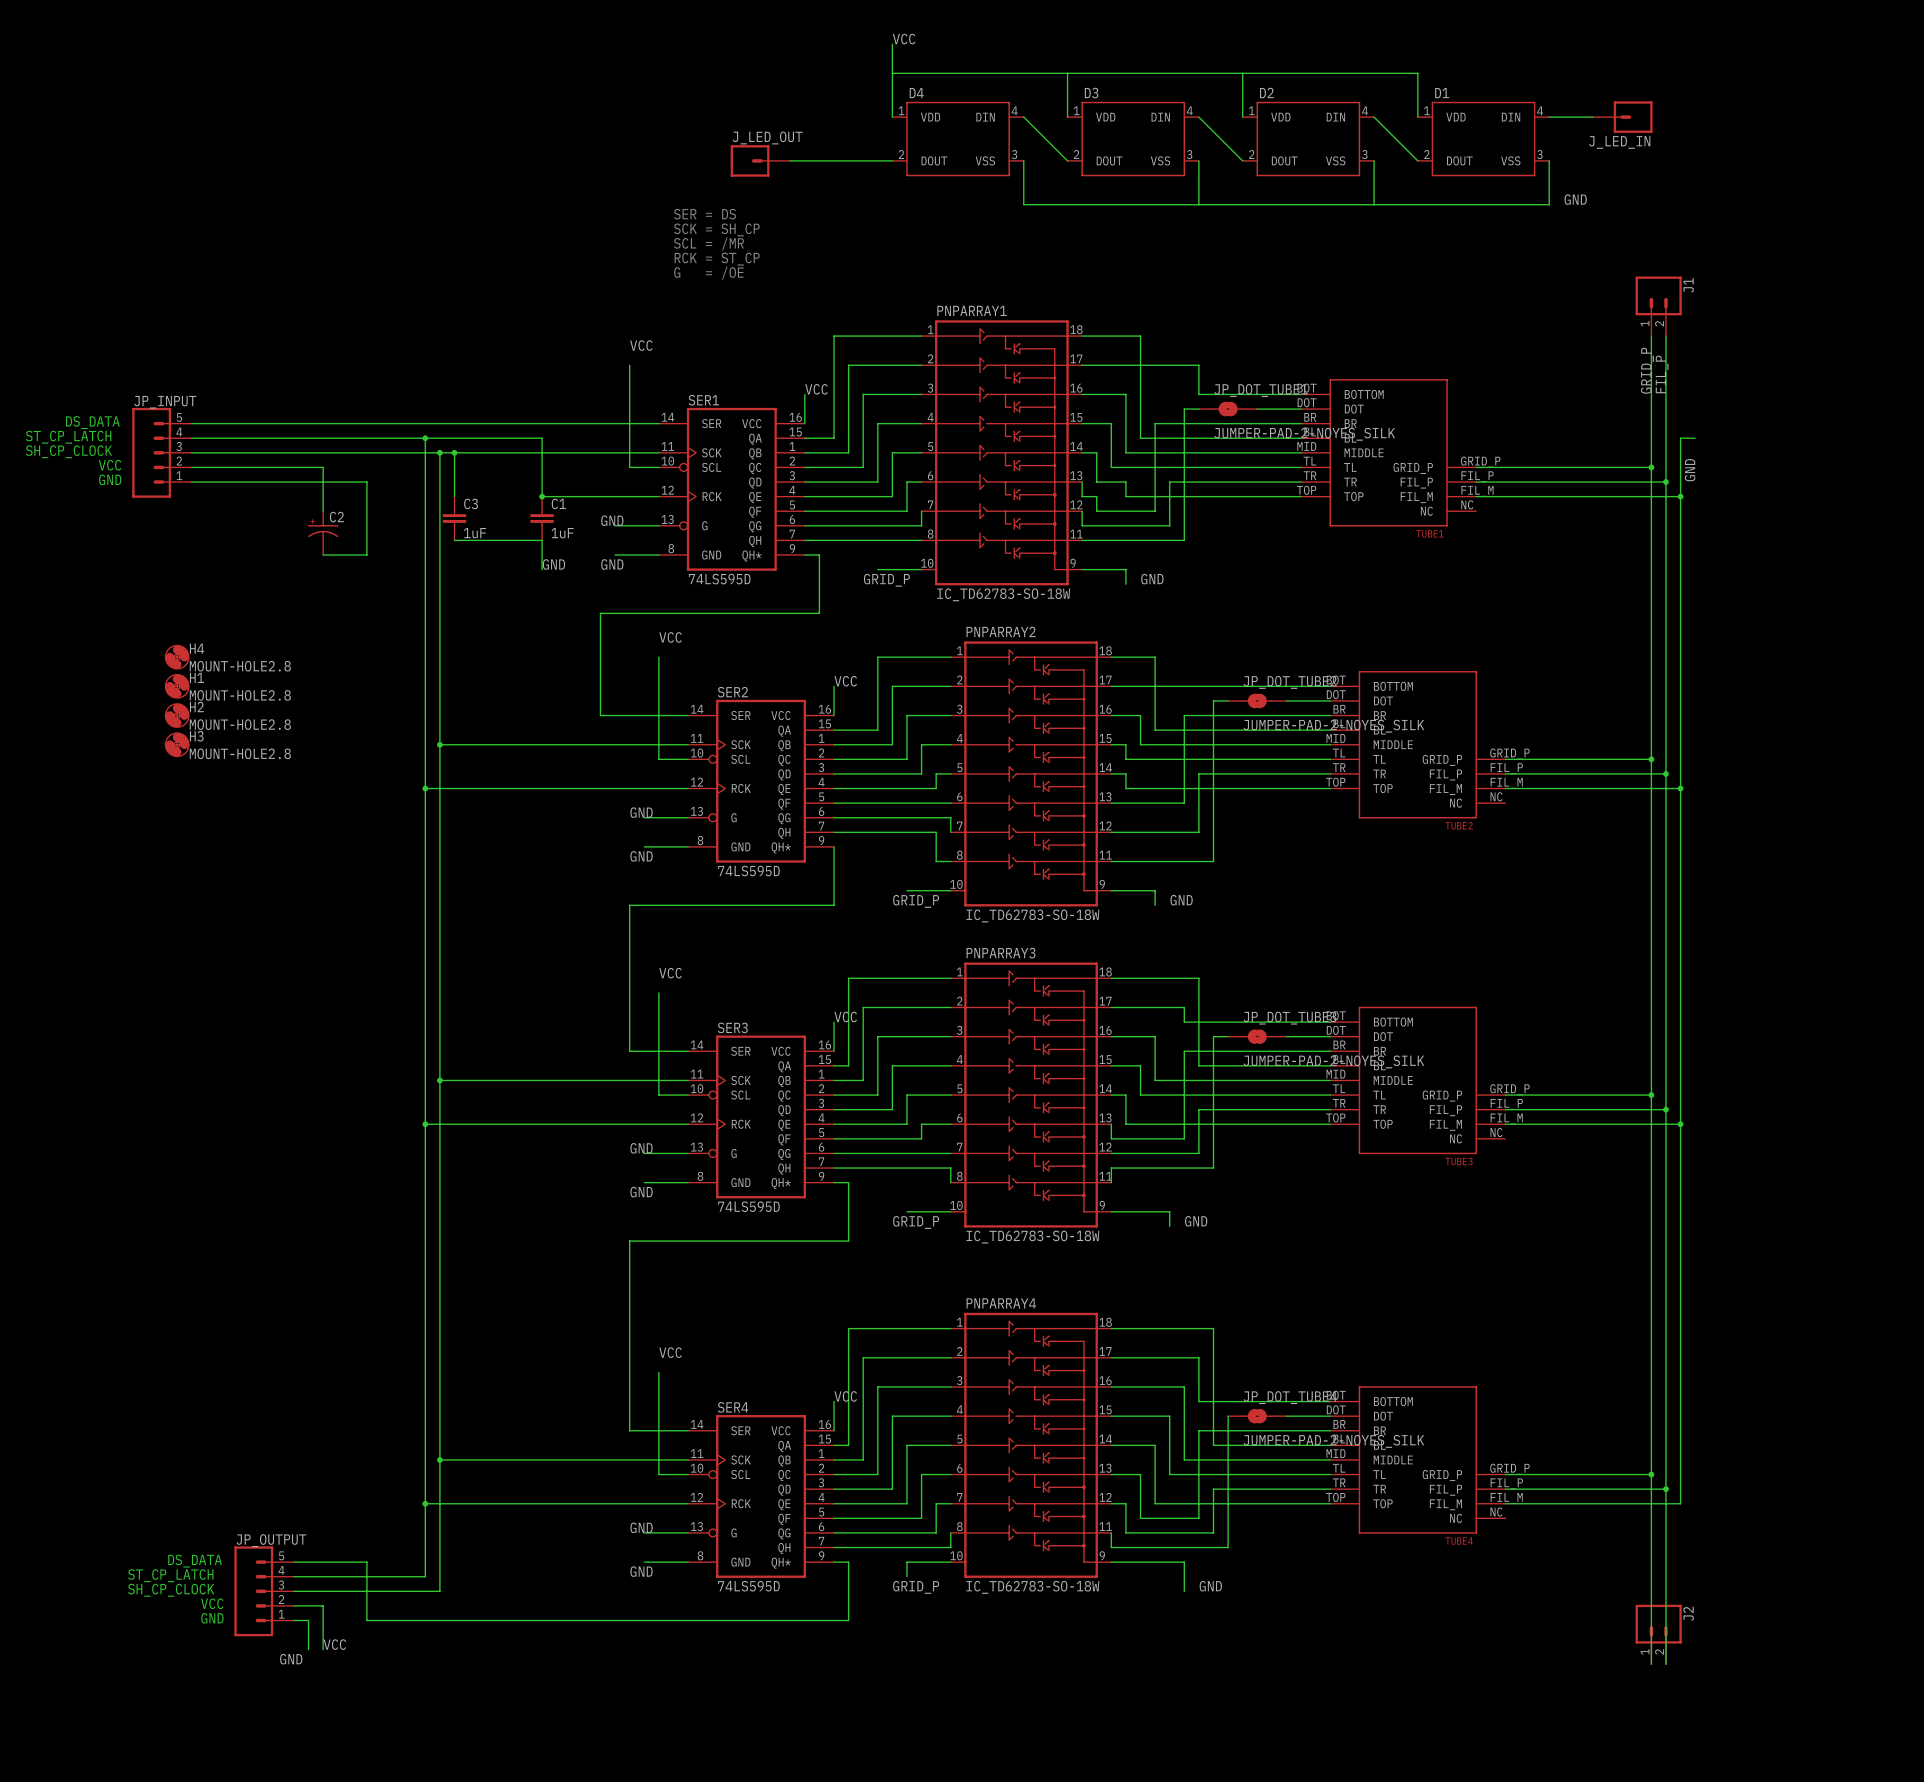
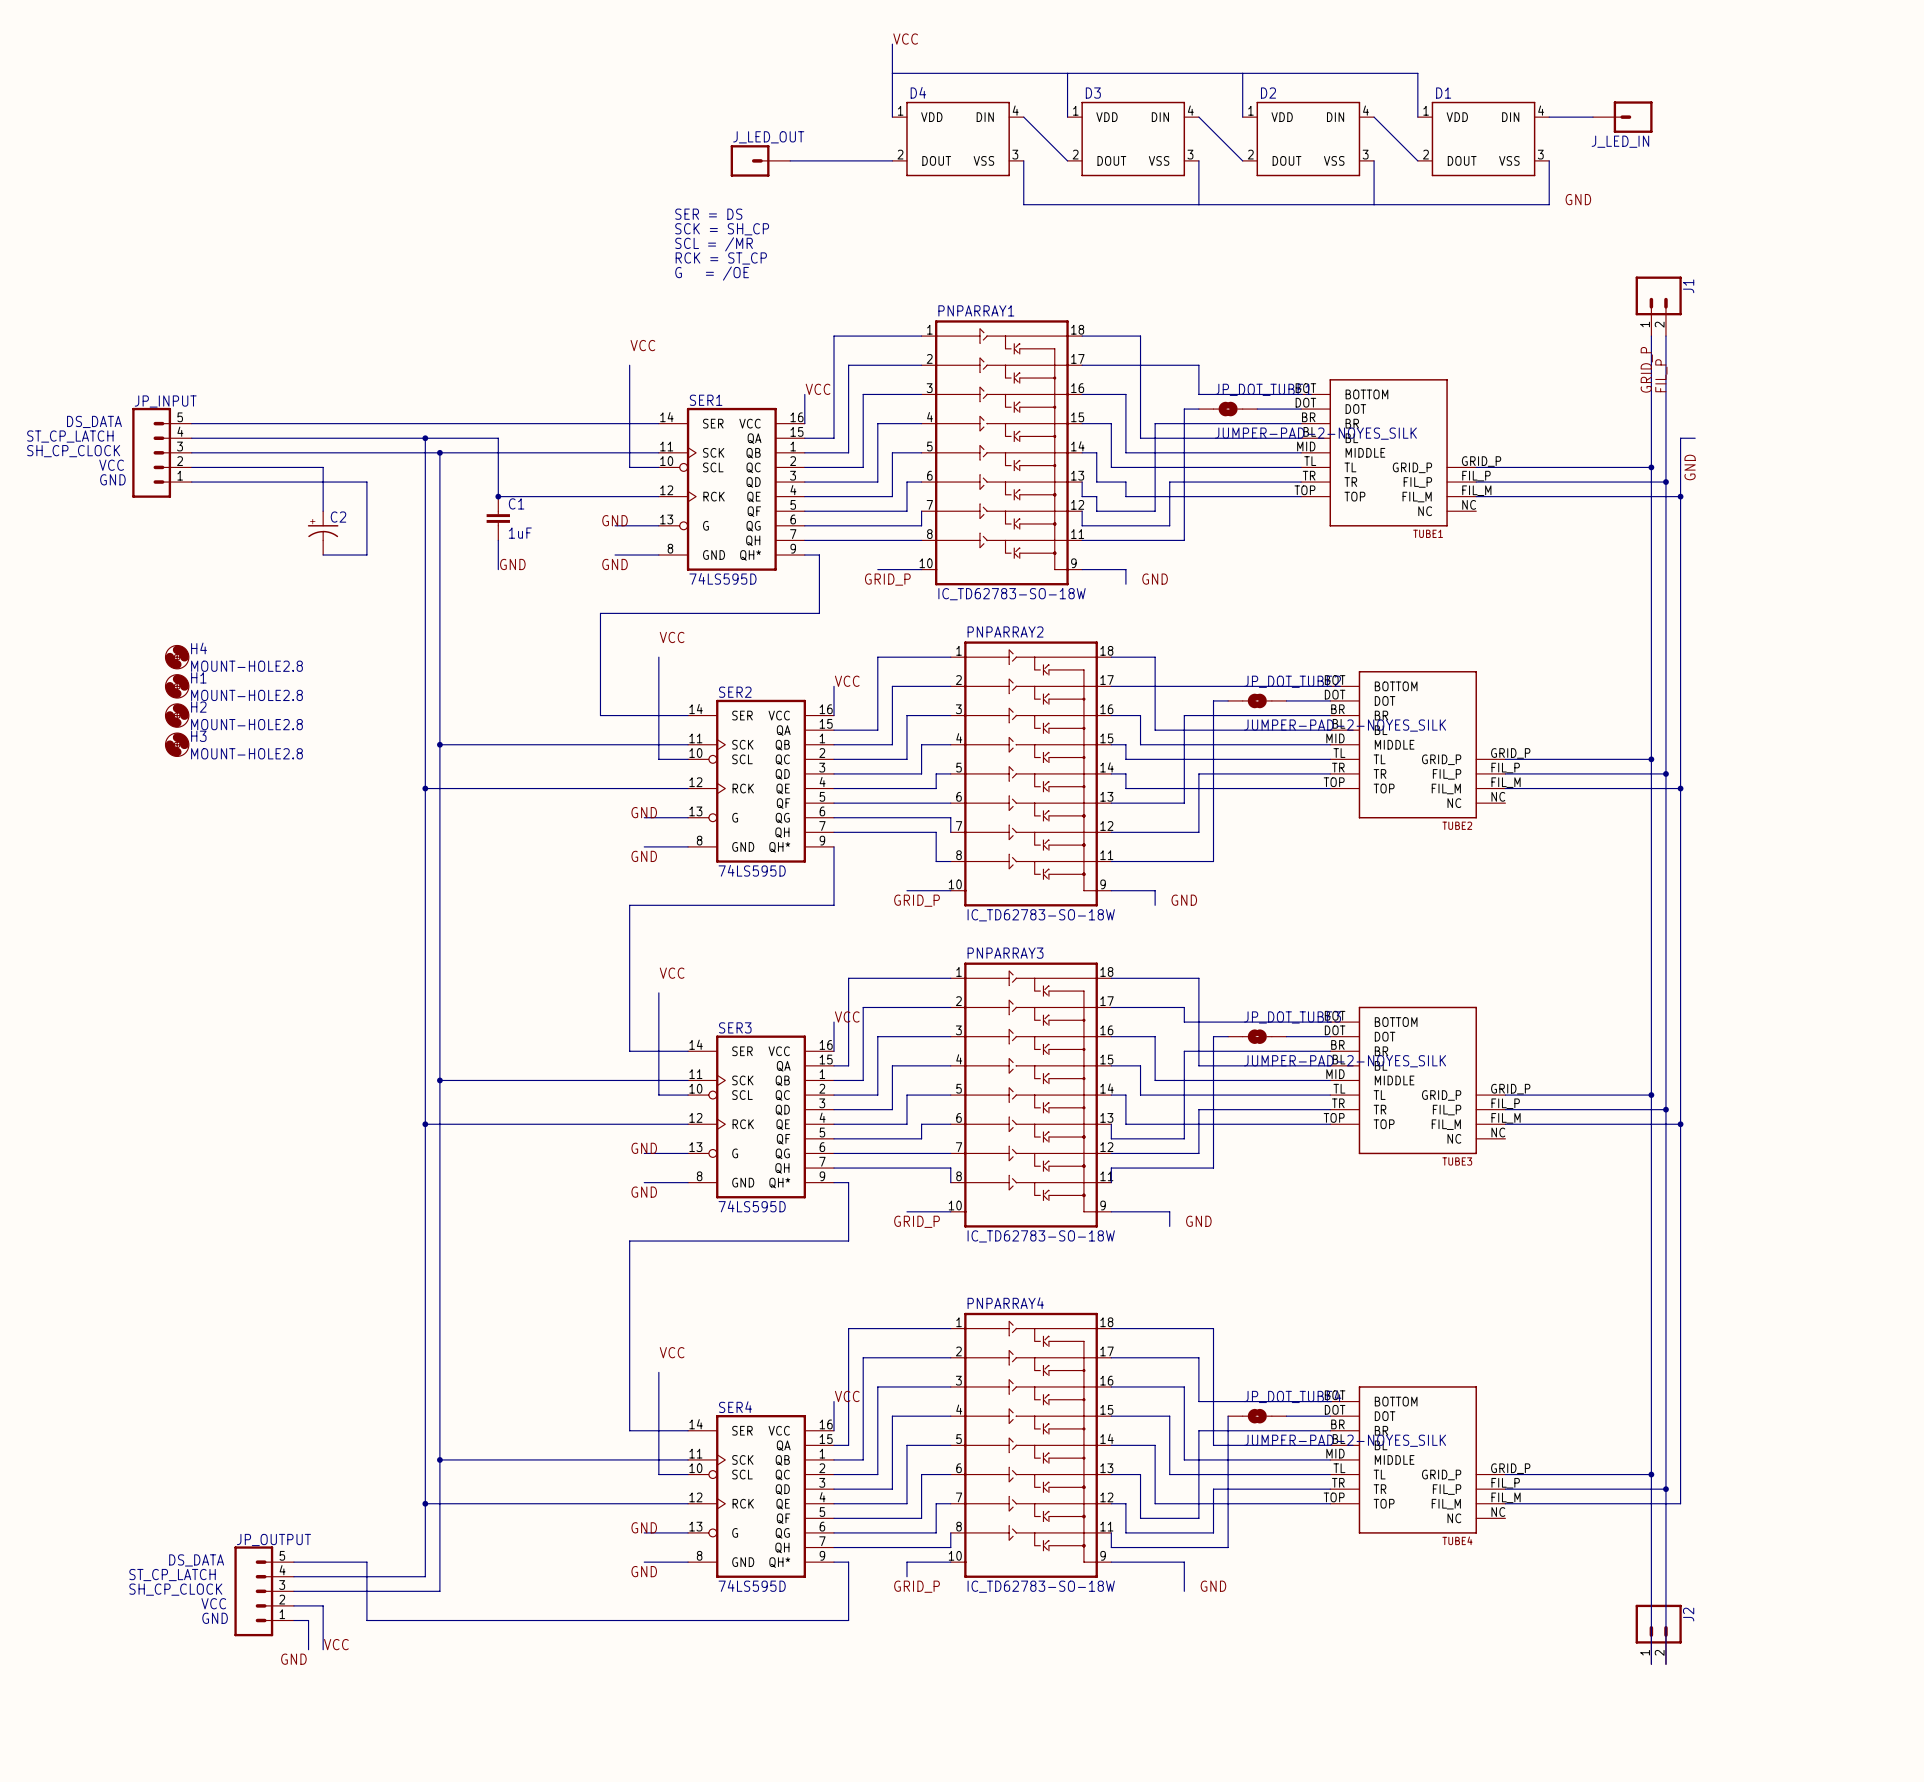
wire: (498, 438) (542, 438) (542, 496) -> (498, 438) (498, 496) (542, 496)
wire: (454, 452) (454, 496) -> none
junction: (454, 452) -> none
junction: none -> (498, 496)
junction: (542, 496) -> none
C3: 1uF (454, 518) -> none
C1 position: (542, 518) -> (498, 518)
wire: (454, 540) (542, 540) (542, 569) -> none
wire: none -> (498, 540) (498, 569)
label position: GND (553, 564) -> GND (512, 564)

